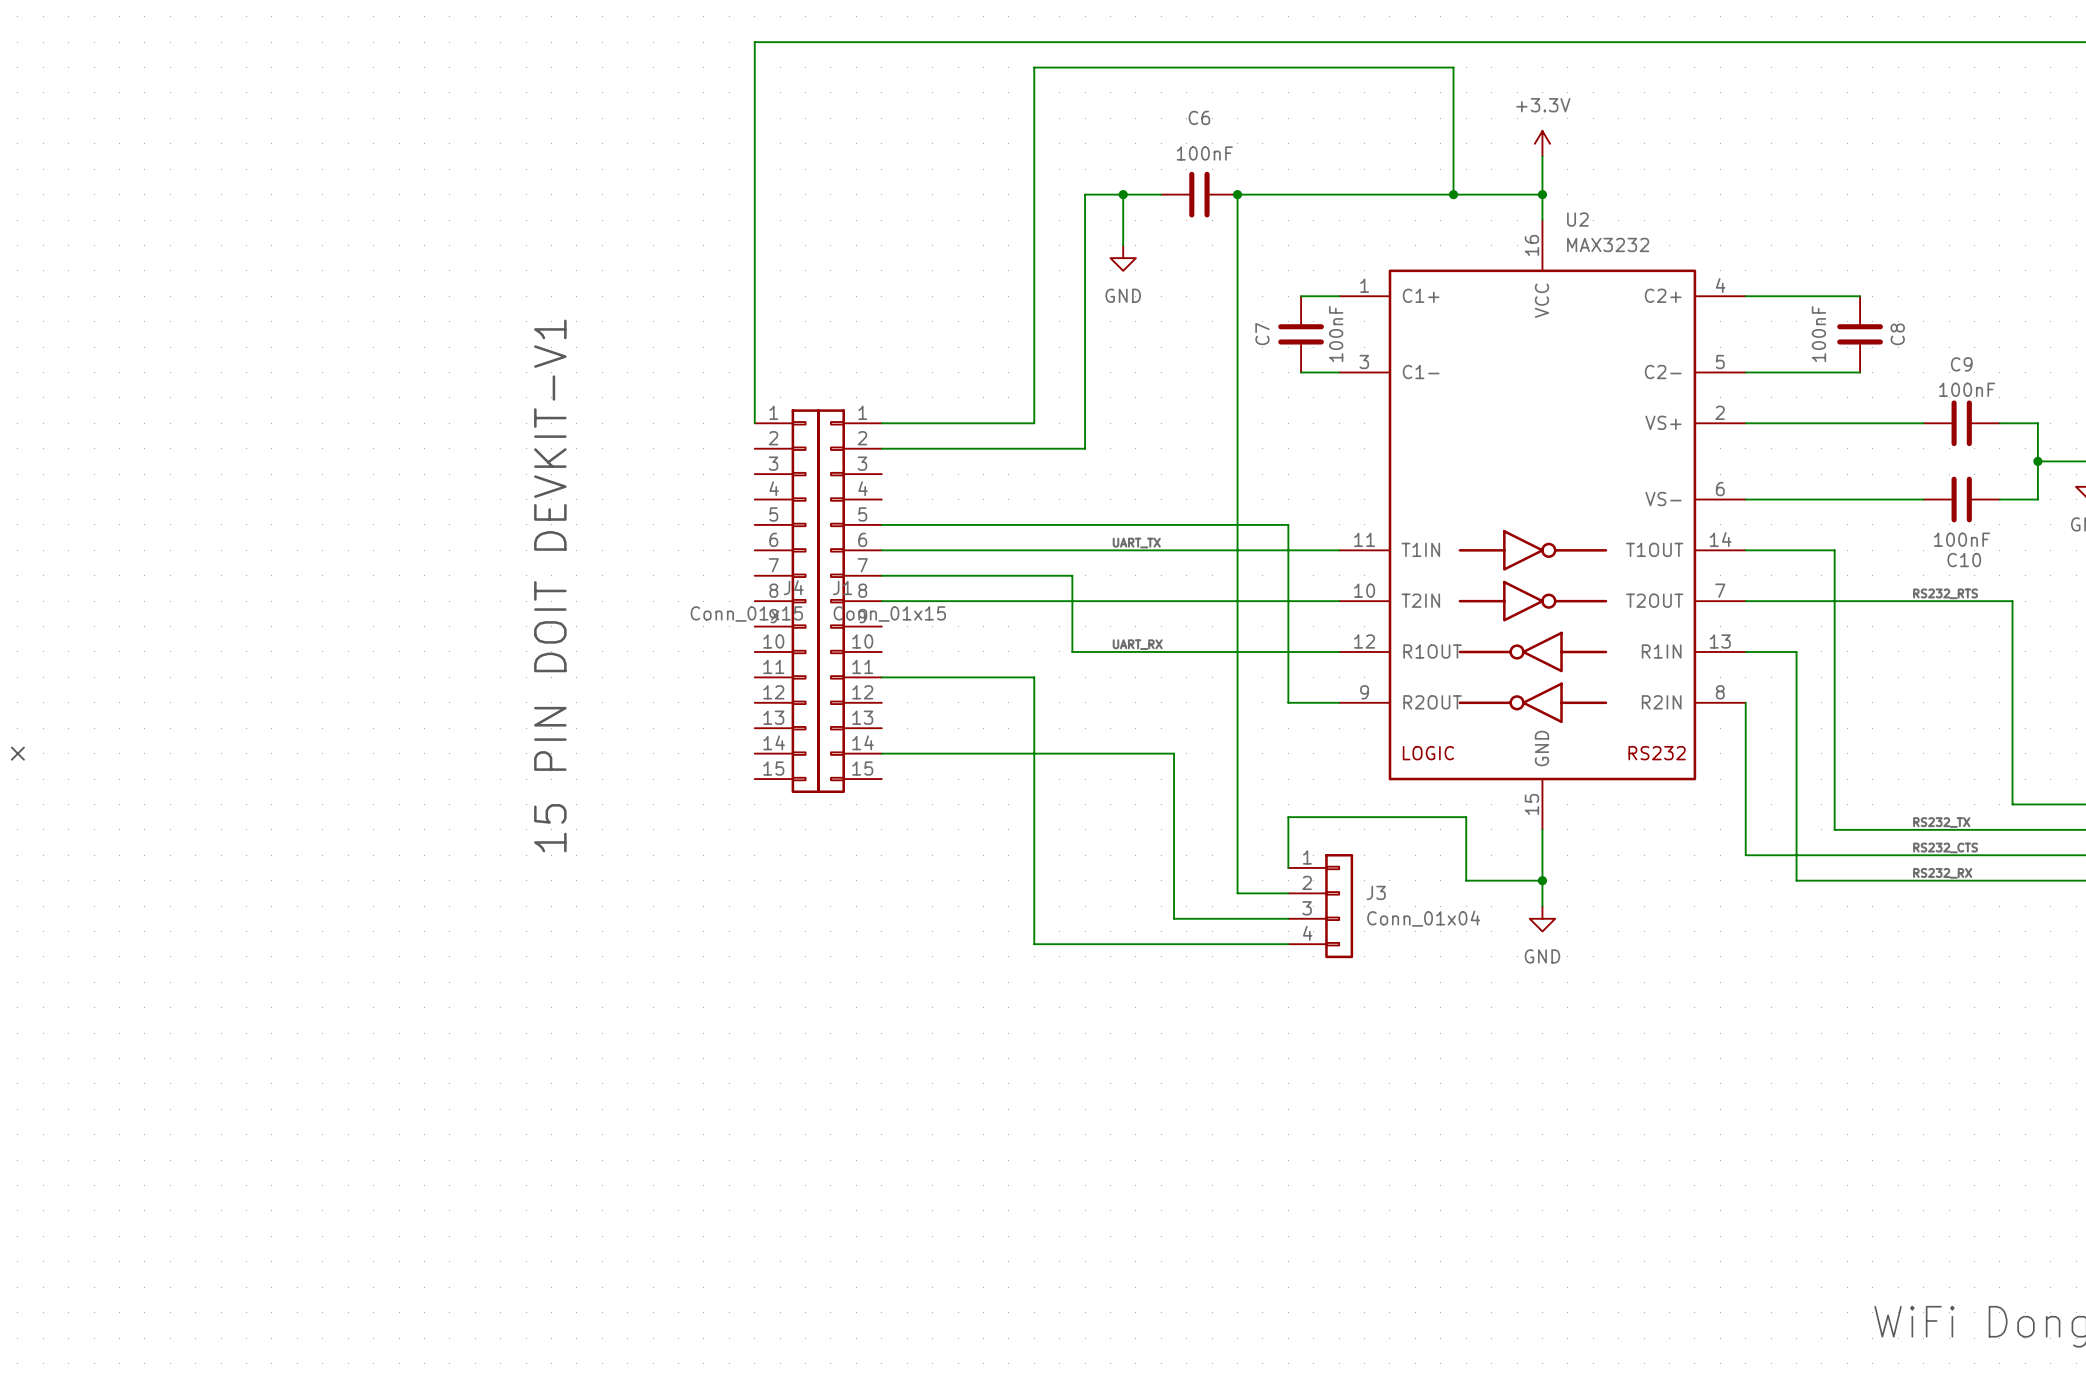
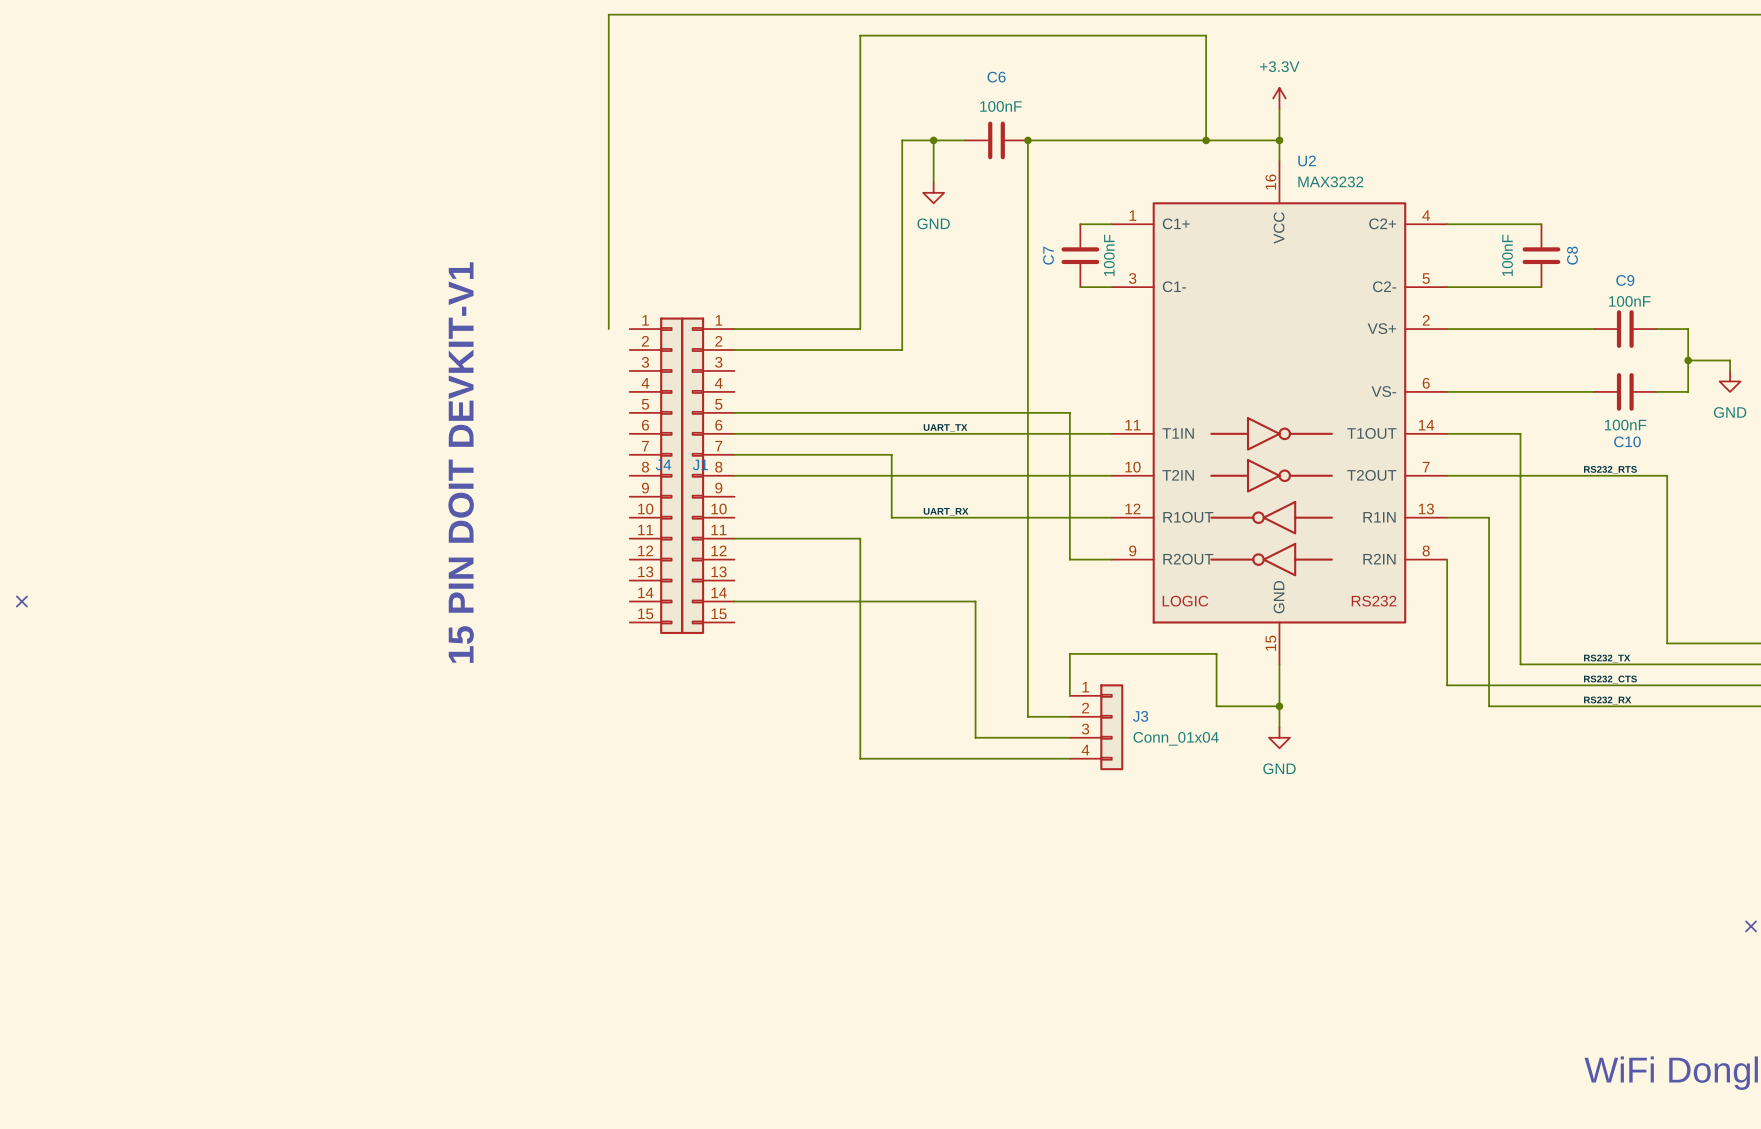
wire: (754, 42) (754, 423) -> (629, 14) (608, 14) (608, 329)
J4 value: Conn_01x15 (746, 614) -> none
J1 value: Conn_01x15 (889, 614) -> none

